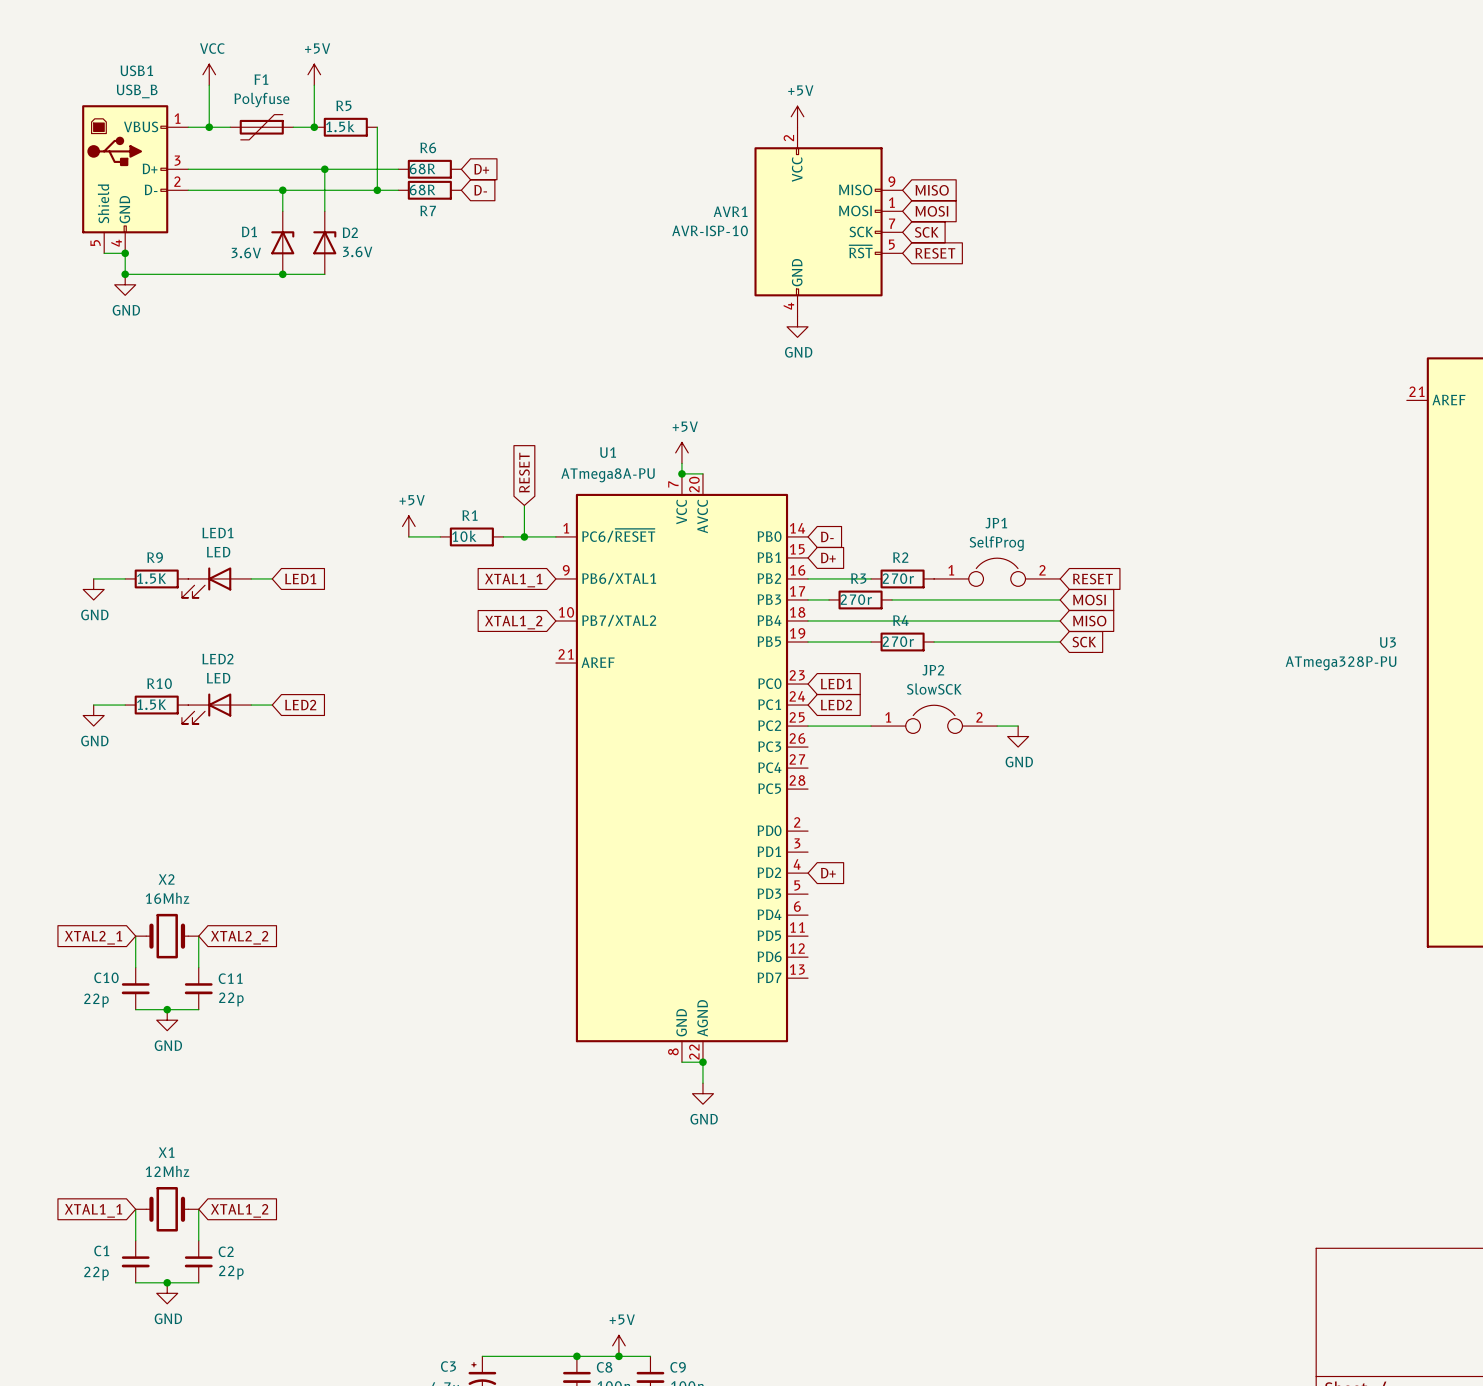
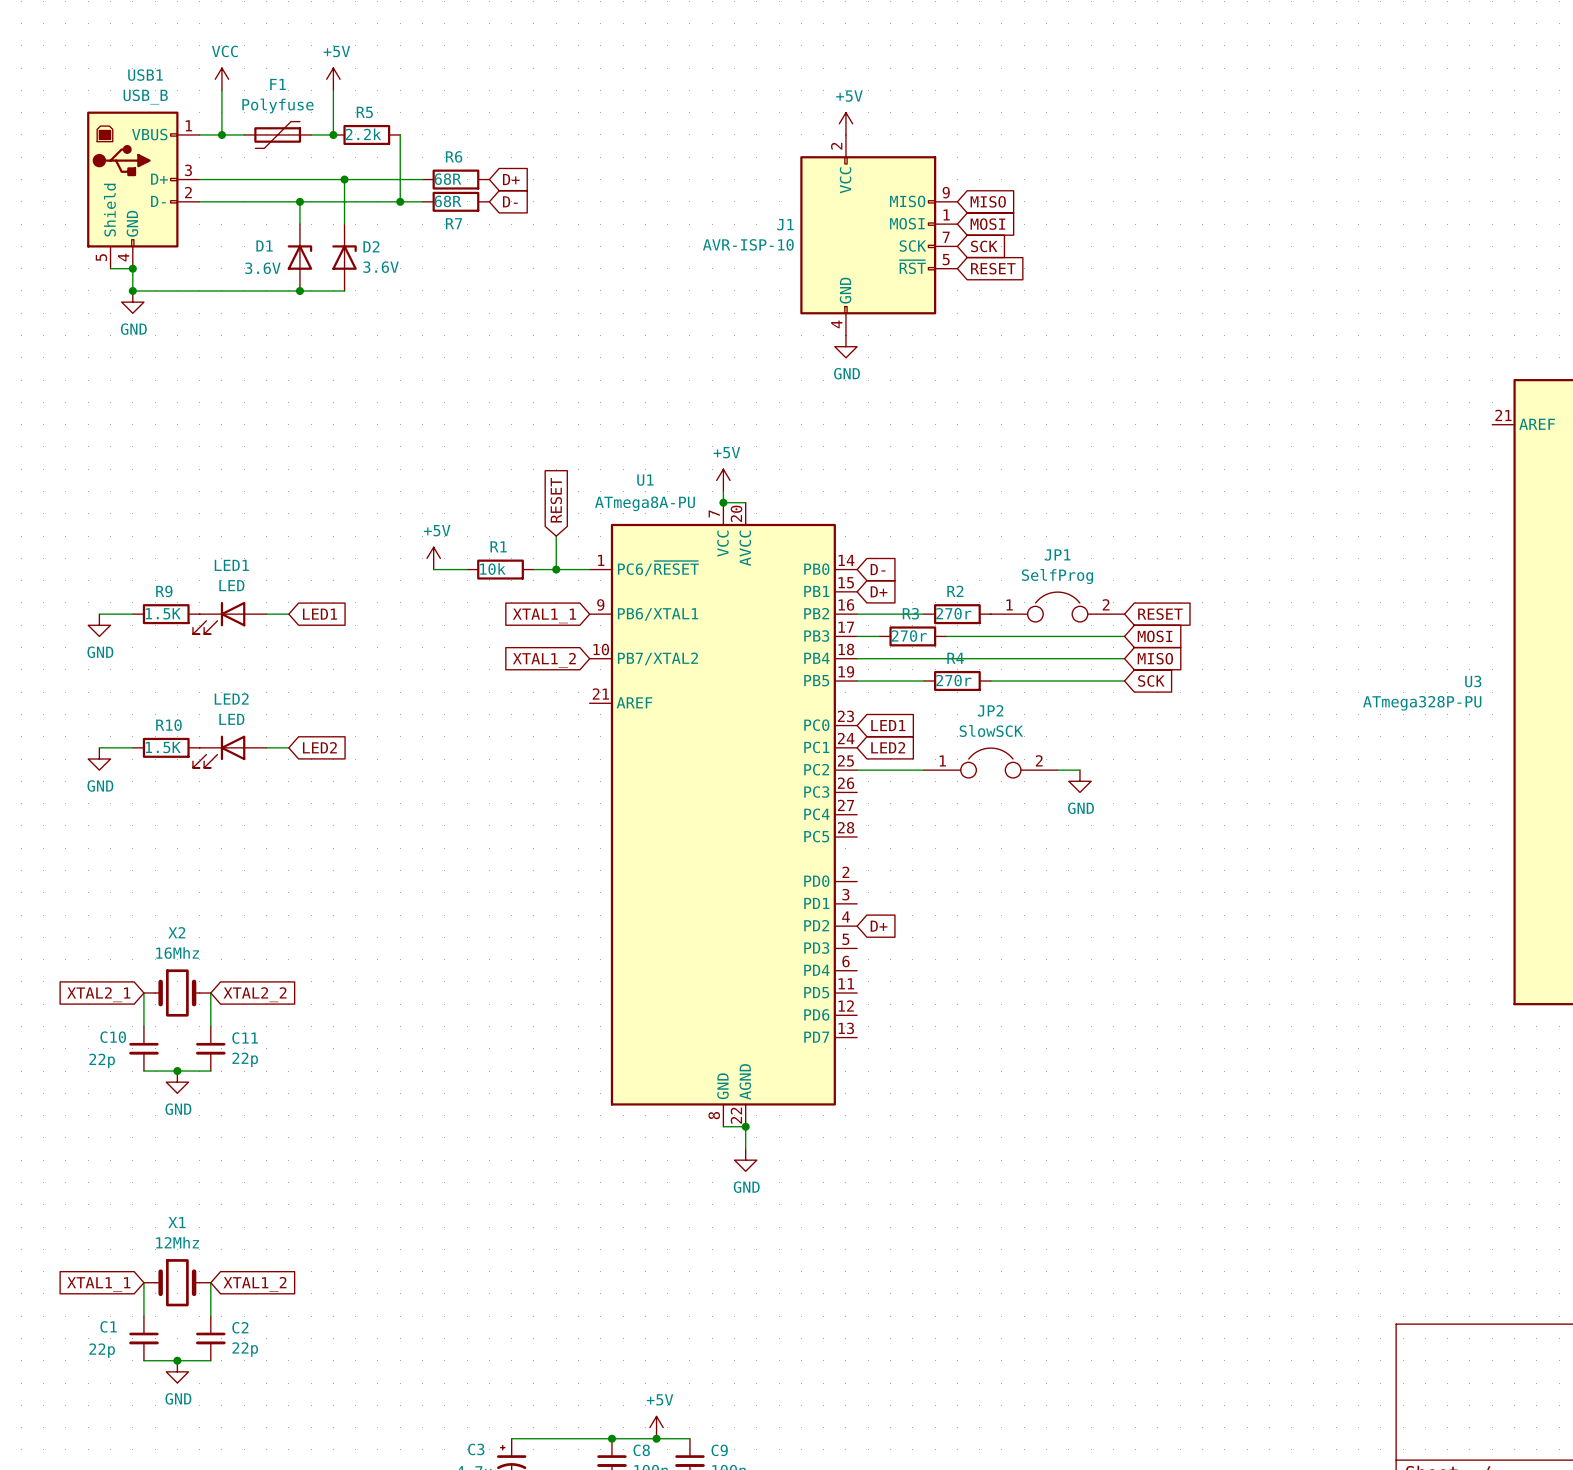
R5 value: 1.5k (340, 126) -> 2.2k (363, 134)
AVR1 name: AVR1 (730, 211) -> J1 (785, 224)

